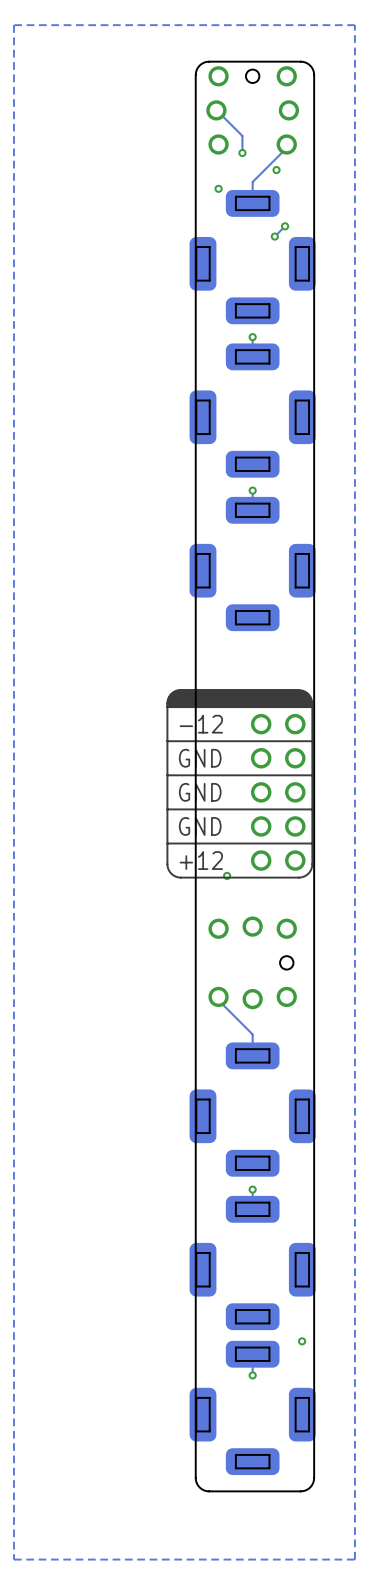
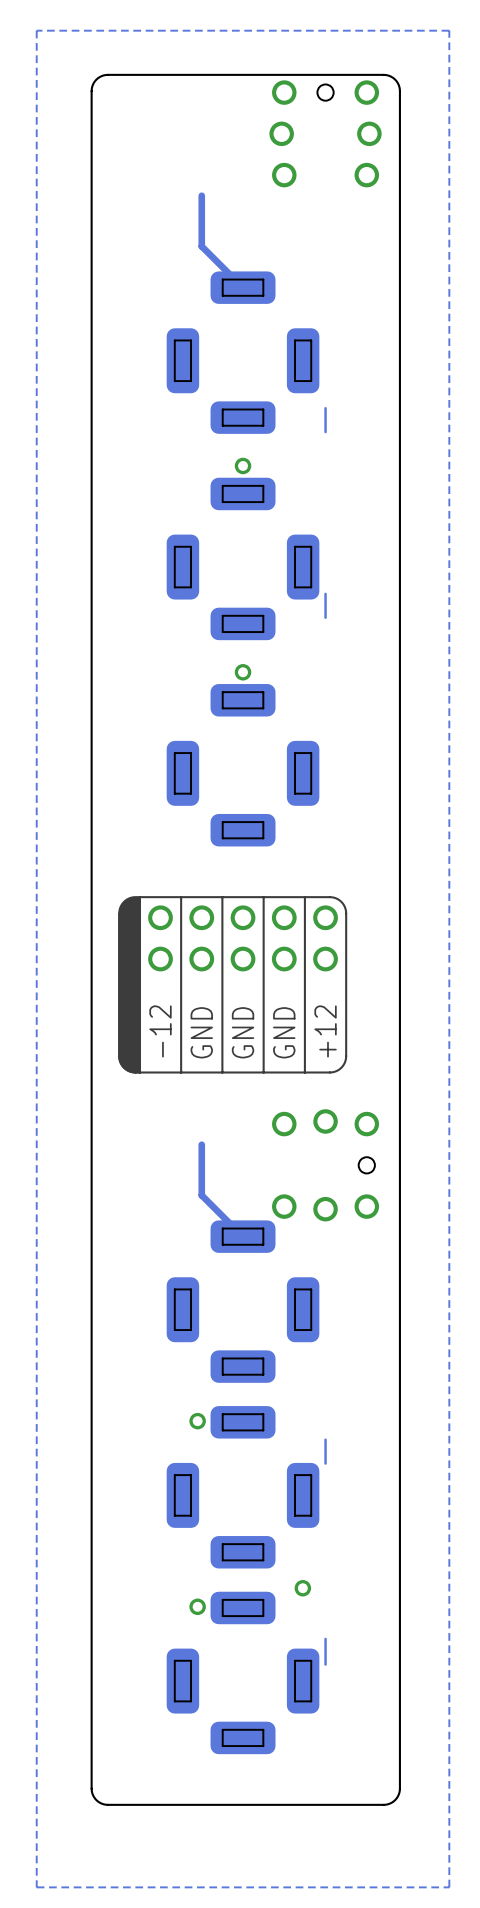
drawing: none -> [90, 73, 401, 1806]
drawing: [194, 60, 316, 1493] -> none
track: (216, 110) (242, 135) (242, 153) -> none
track: (286, 144) (286, 147) (252, 182) (252, 203) -> none
via: (242, 153) -> none
track: none -> (201, 195) (201, 246) (243, 287)
via: (276, 170) -> none
via: (218, 188) -> none
track: (285, 226) (274, 236) -> none
via: (285, 226) -> none
via: (274, 236) -> none
part: (252, 257) -> none
part: none -> (243, 352)
via: (252, 337) -> none
via: none -> (243, 465)
part: (252, 410) -> none
part: none -> (243, 558)
via: (252, 490) -> none
via: none -> (243, 672)
part: (252, 564) -> none
part: none -> (243, 765)
part rotation: 0° (239, 783) -> 90° counterclockwise (232, 984)
via: (227, 875) -> none
track: none -> (201, 1144) (201, 1195) (243, 1236)
track: (218, 996) (218, 1000) (252, 1034) (252, 1055) -> none
part: none -> (243, 1301)
part: (252, 1109) -> none
via: none -> (197, 1421)
via: (252, 1189) -> none
part: none -> (243, 1487)
part: (252, 1263) -> none
via: none -> (302, 1588)
via: none -> (197, 1606)
via: (302, 1341) -> none
via: (252, 1375) -> none
part: none -> (243, 1672)
part: (252, 1407) -> none

